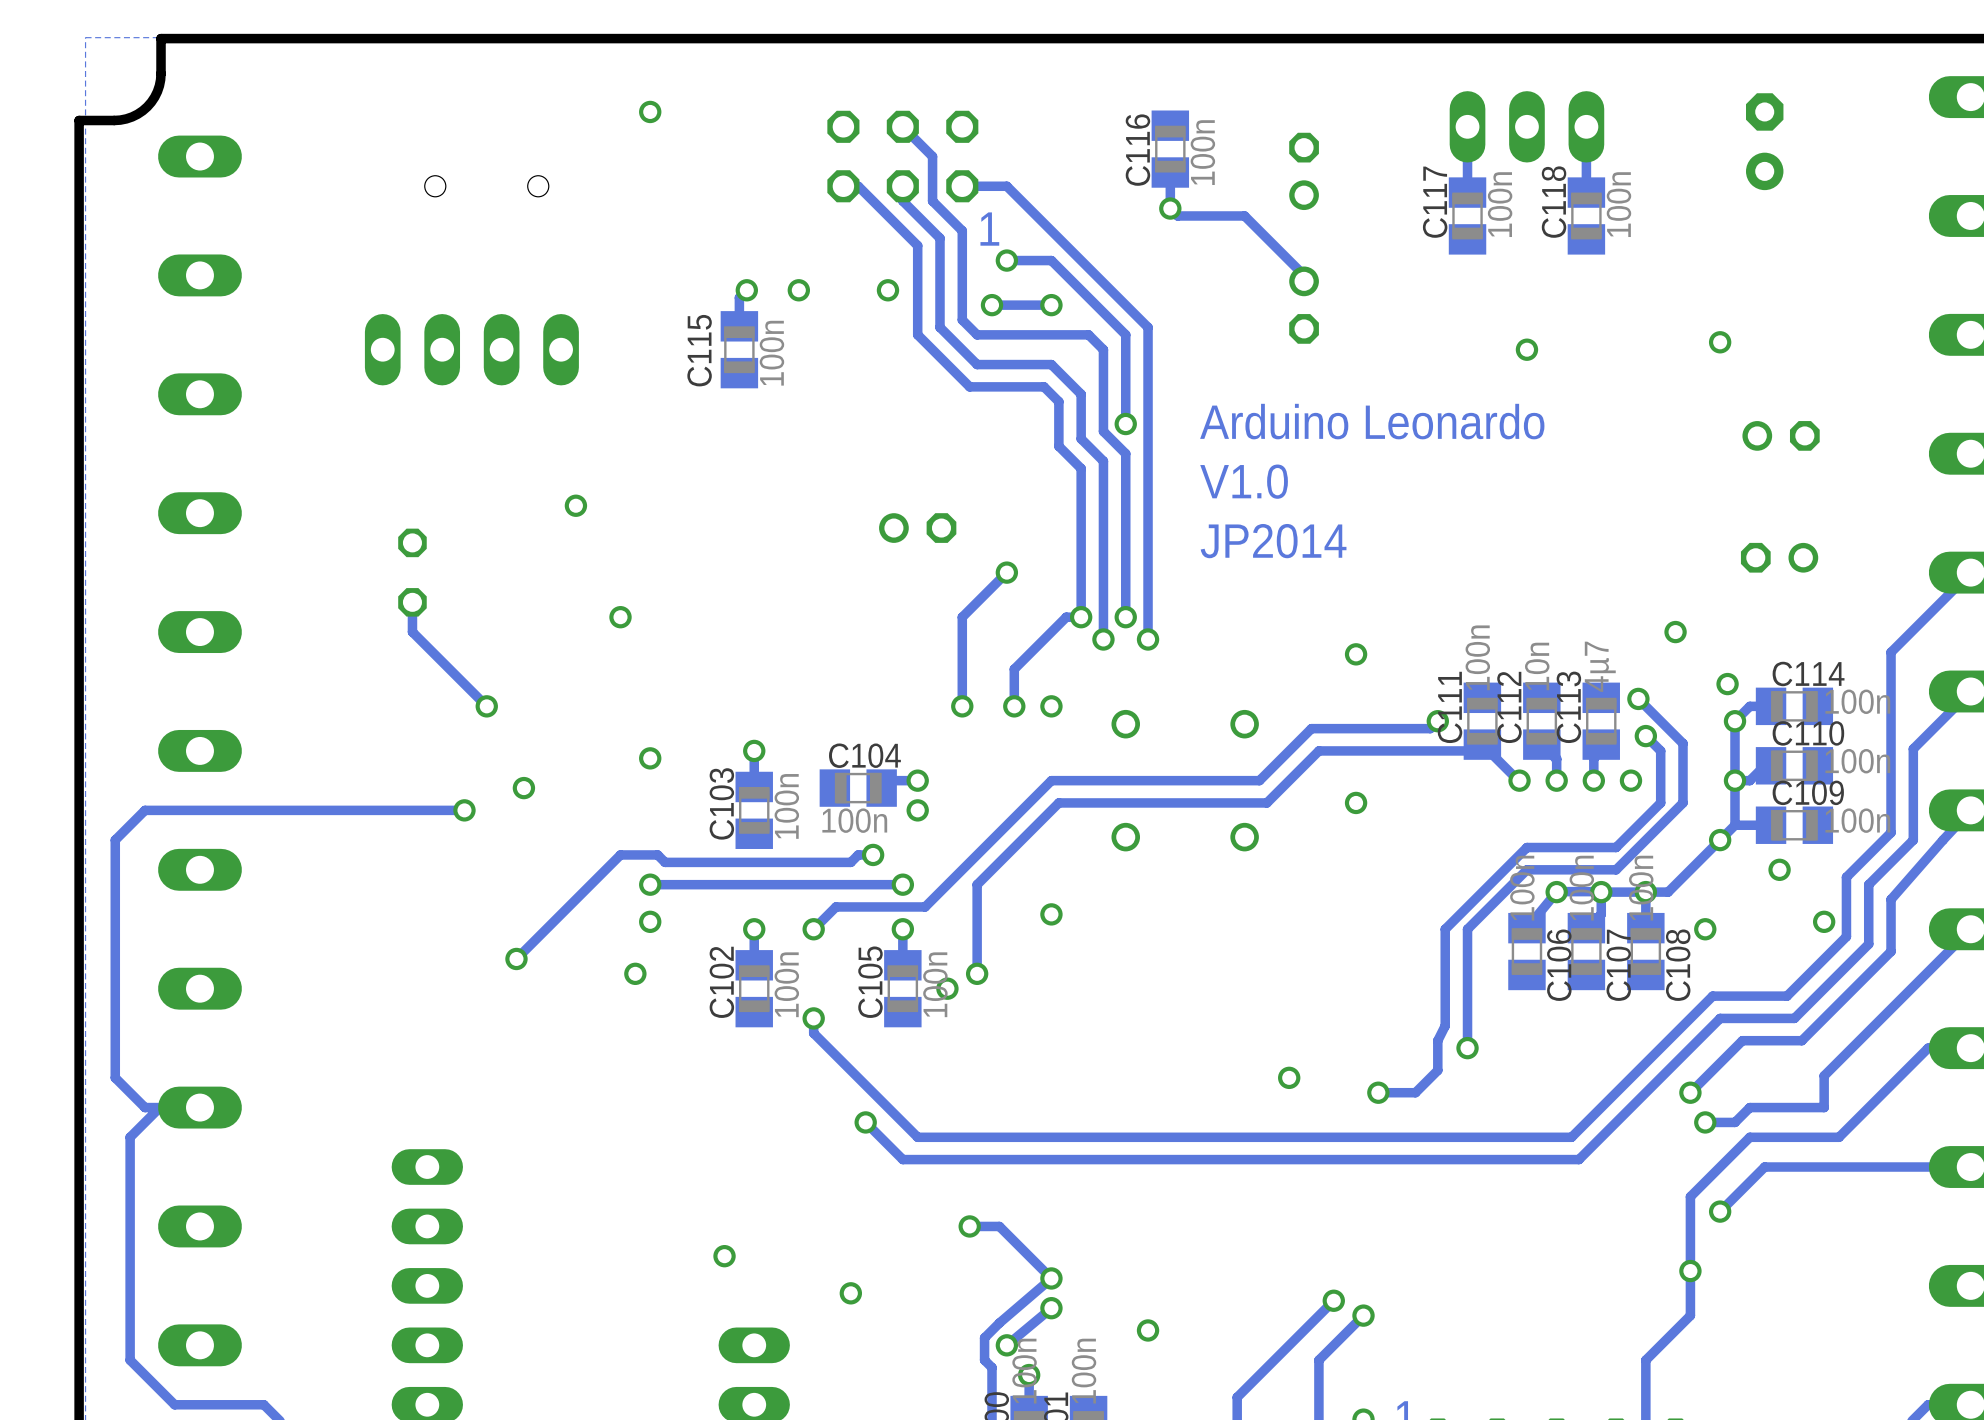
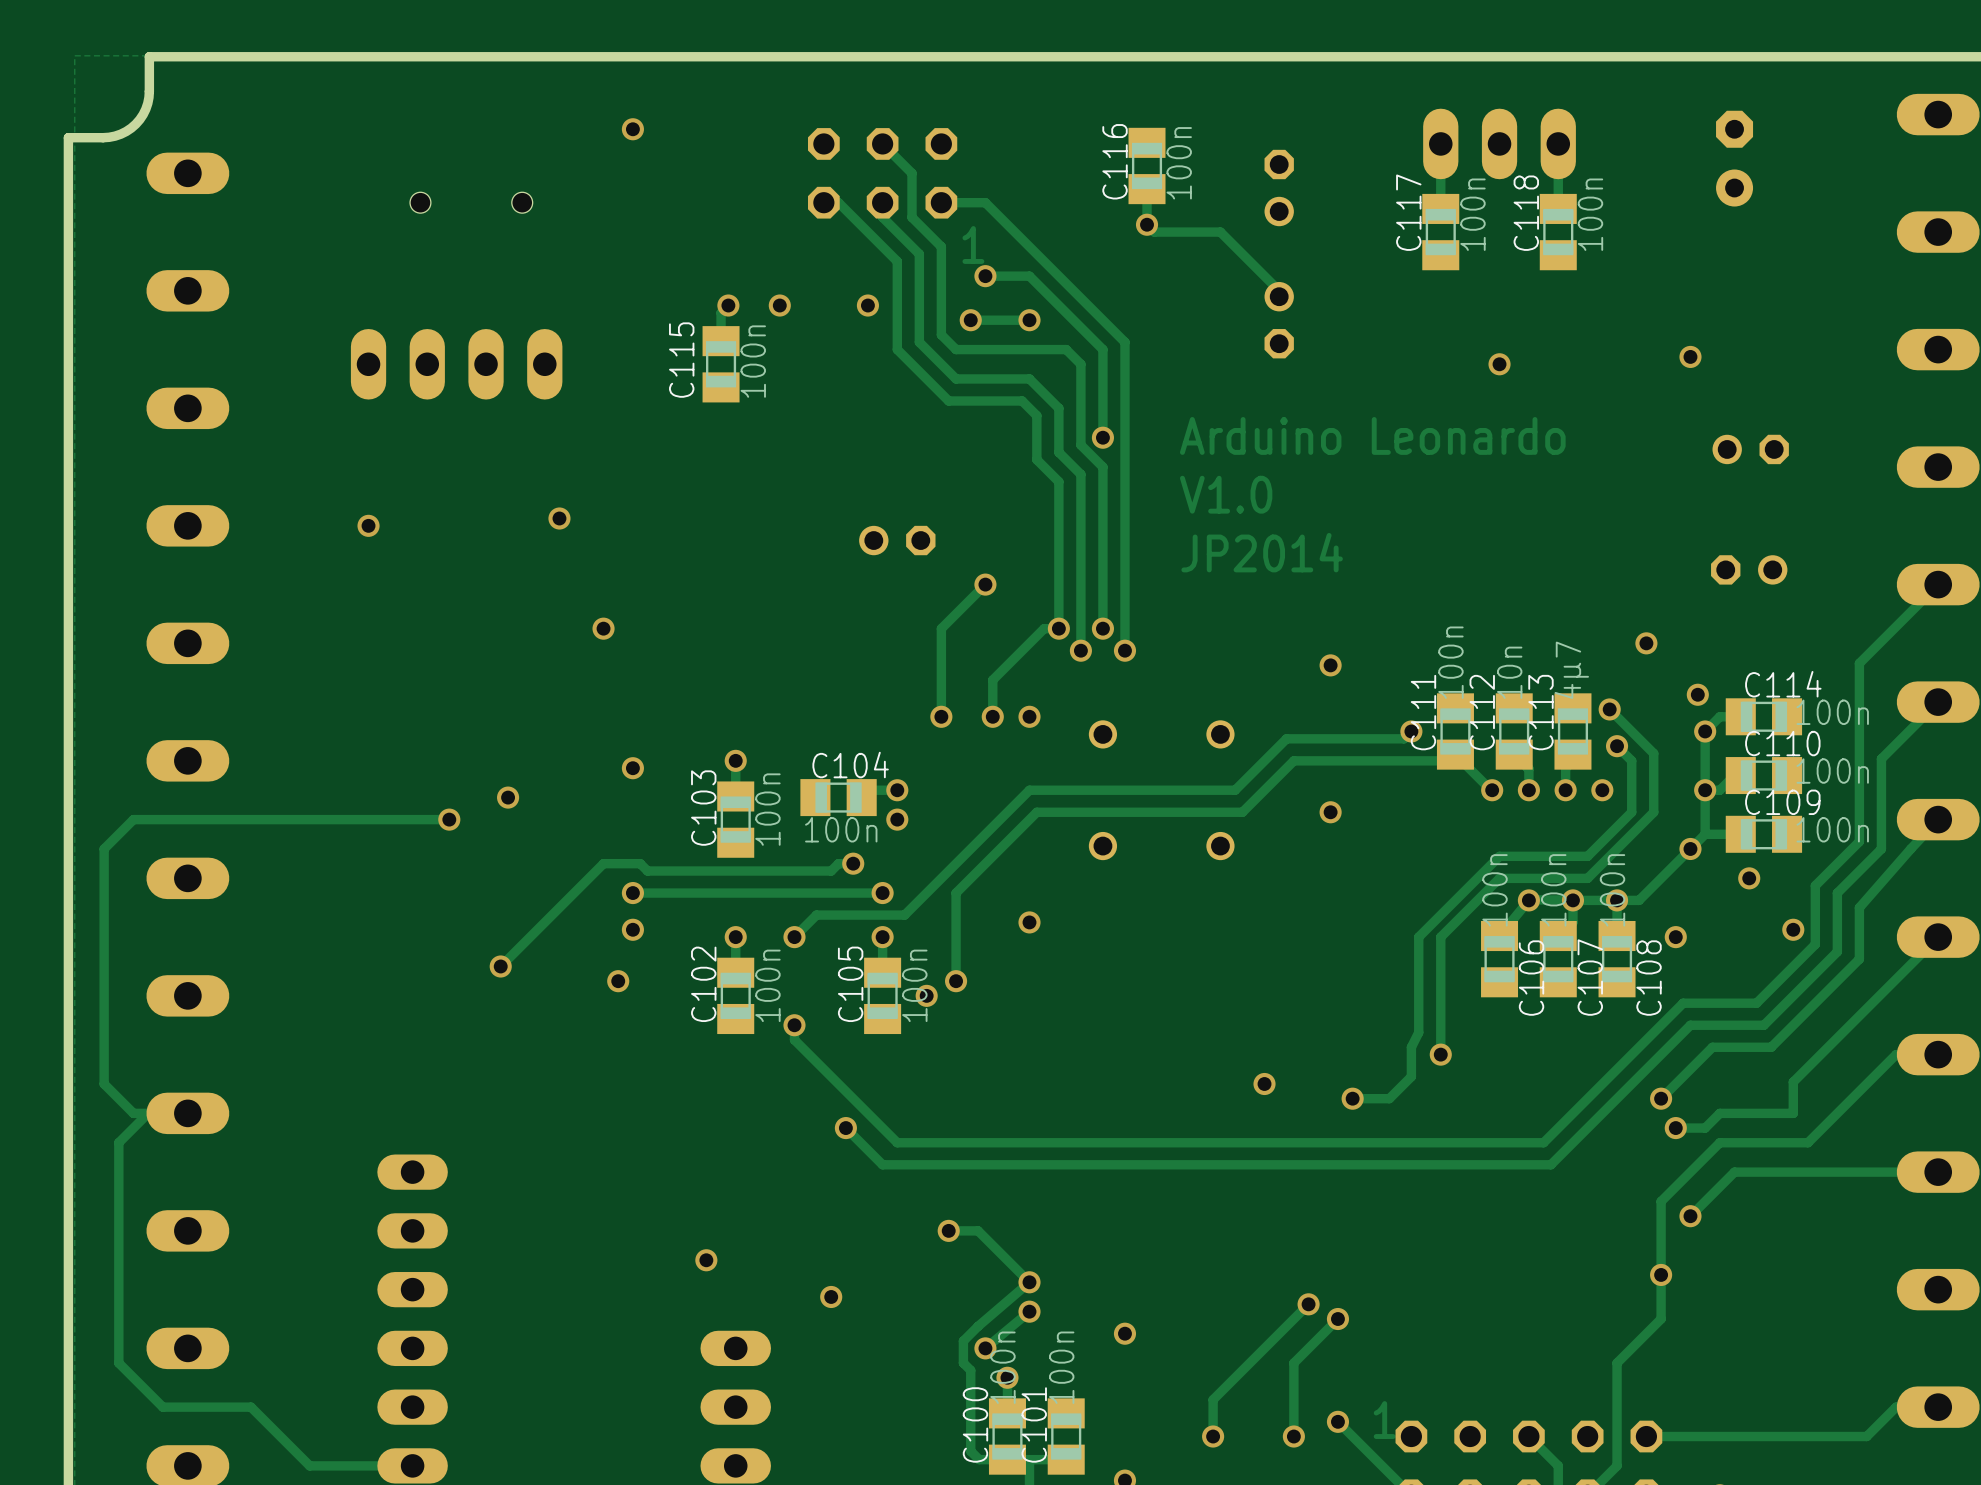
via: none -> (368, 525)
part: (412, 572) -> none
track: (412, 602) (412, 632) (486, 706) -> none
via: (486, 706) -> none

